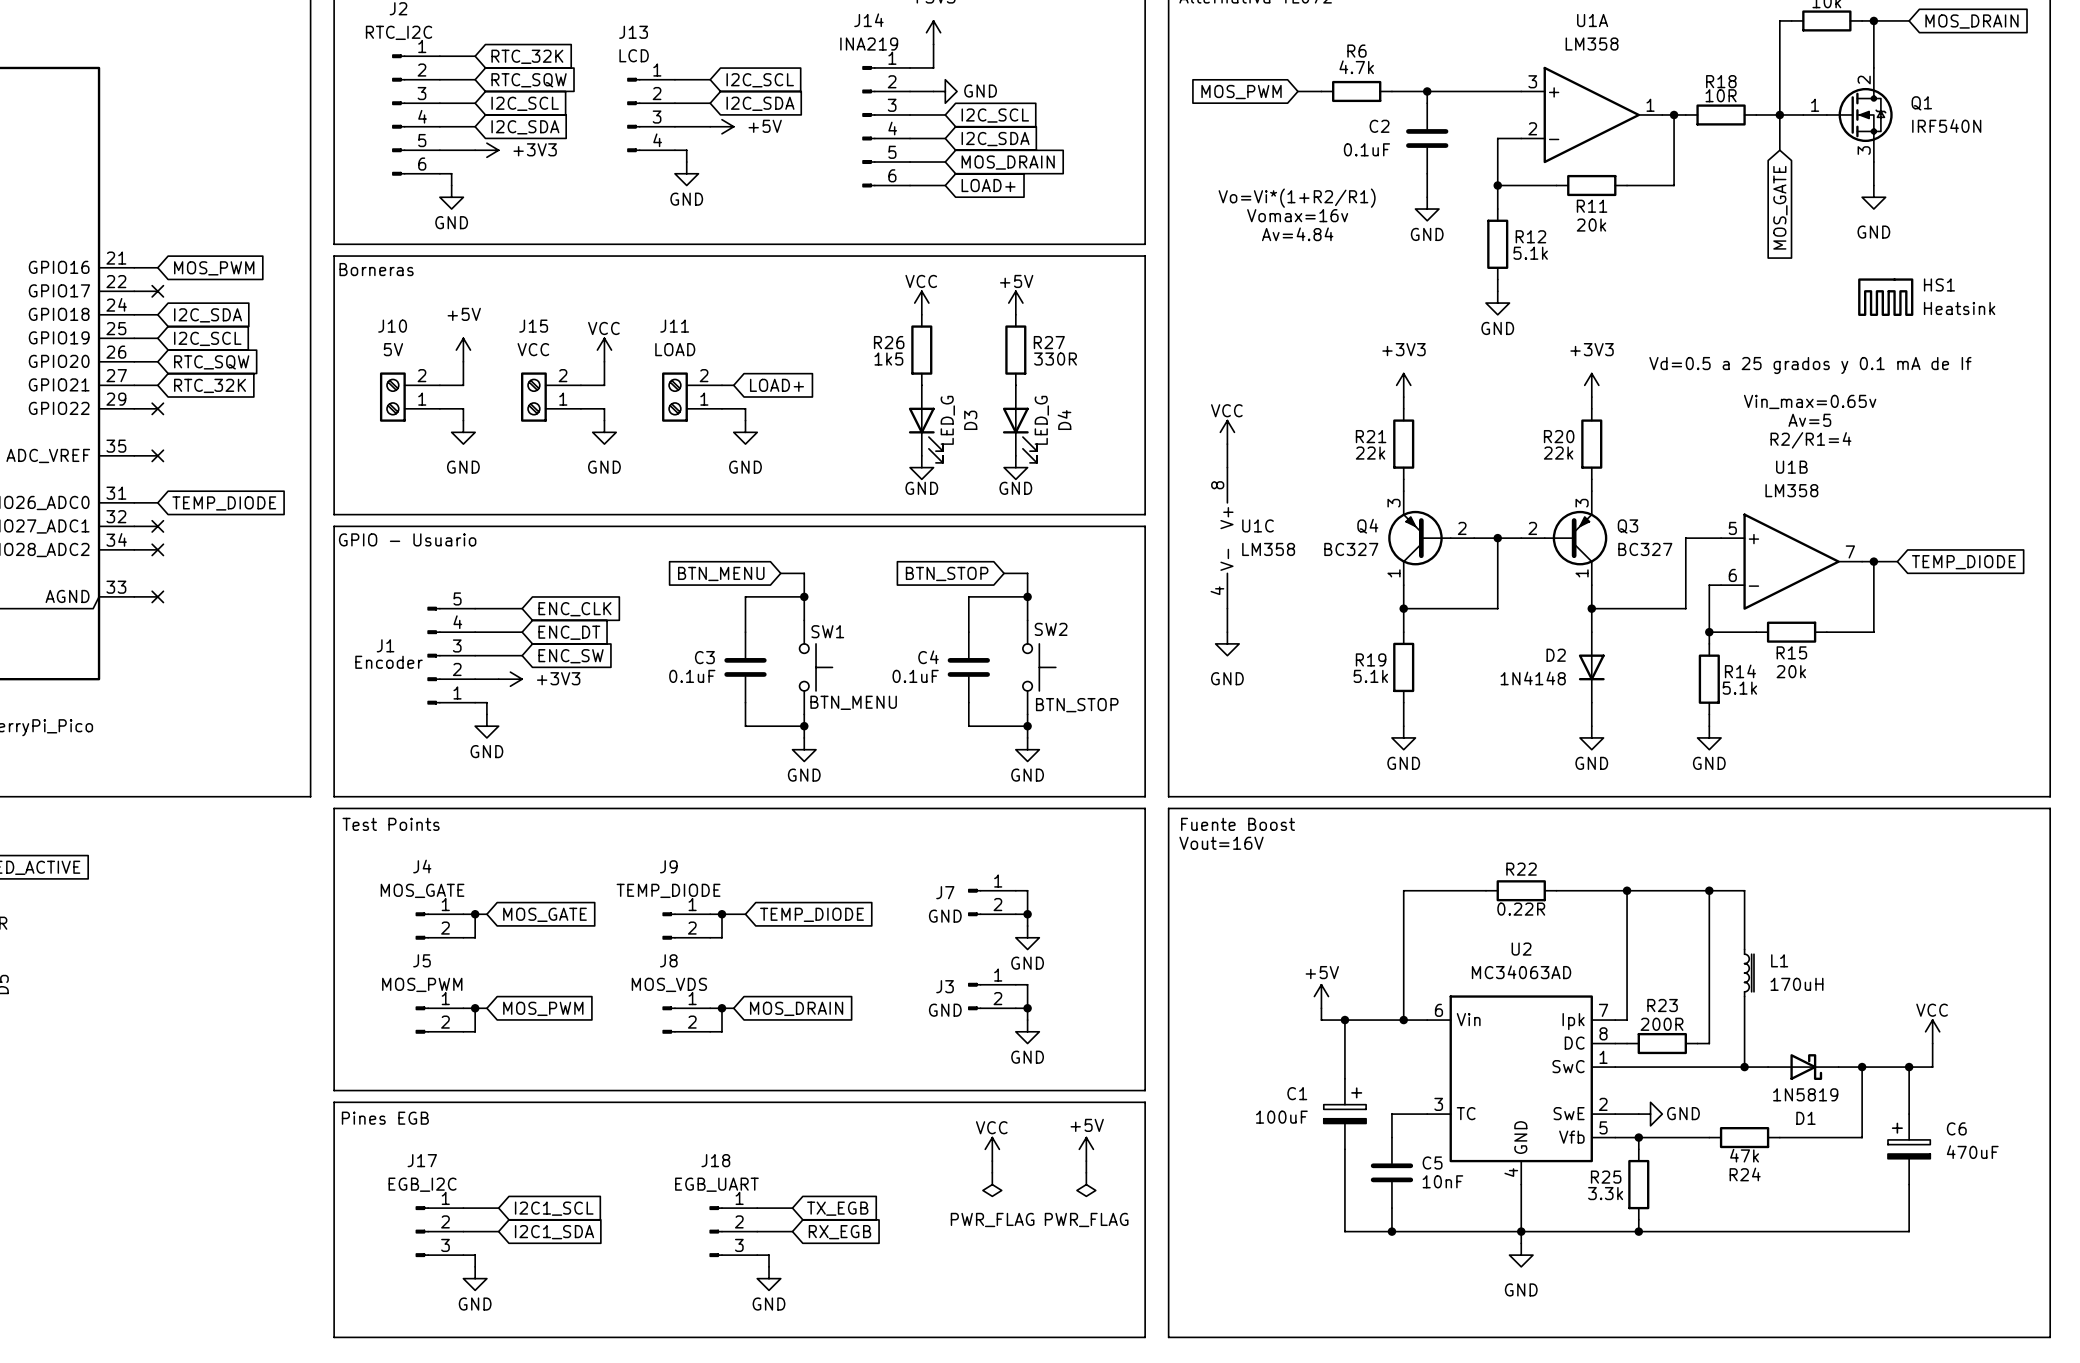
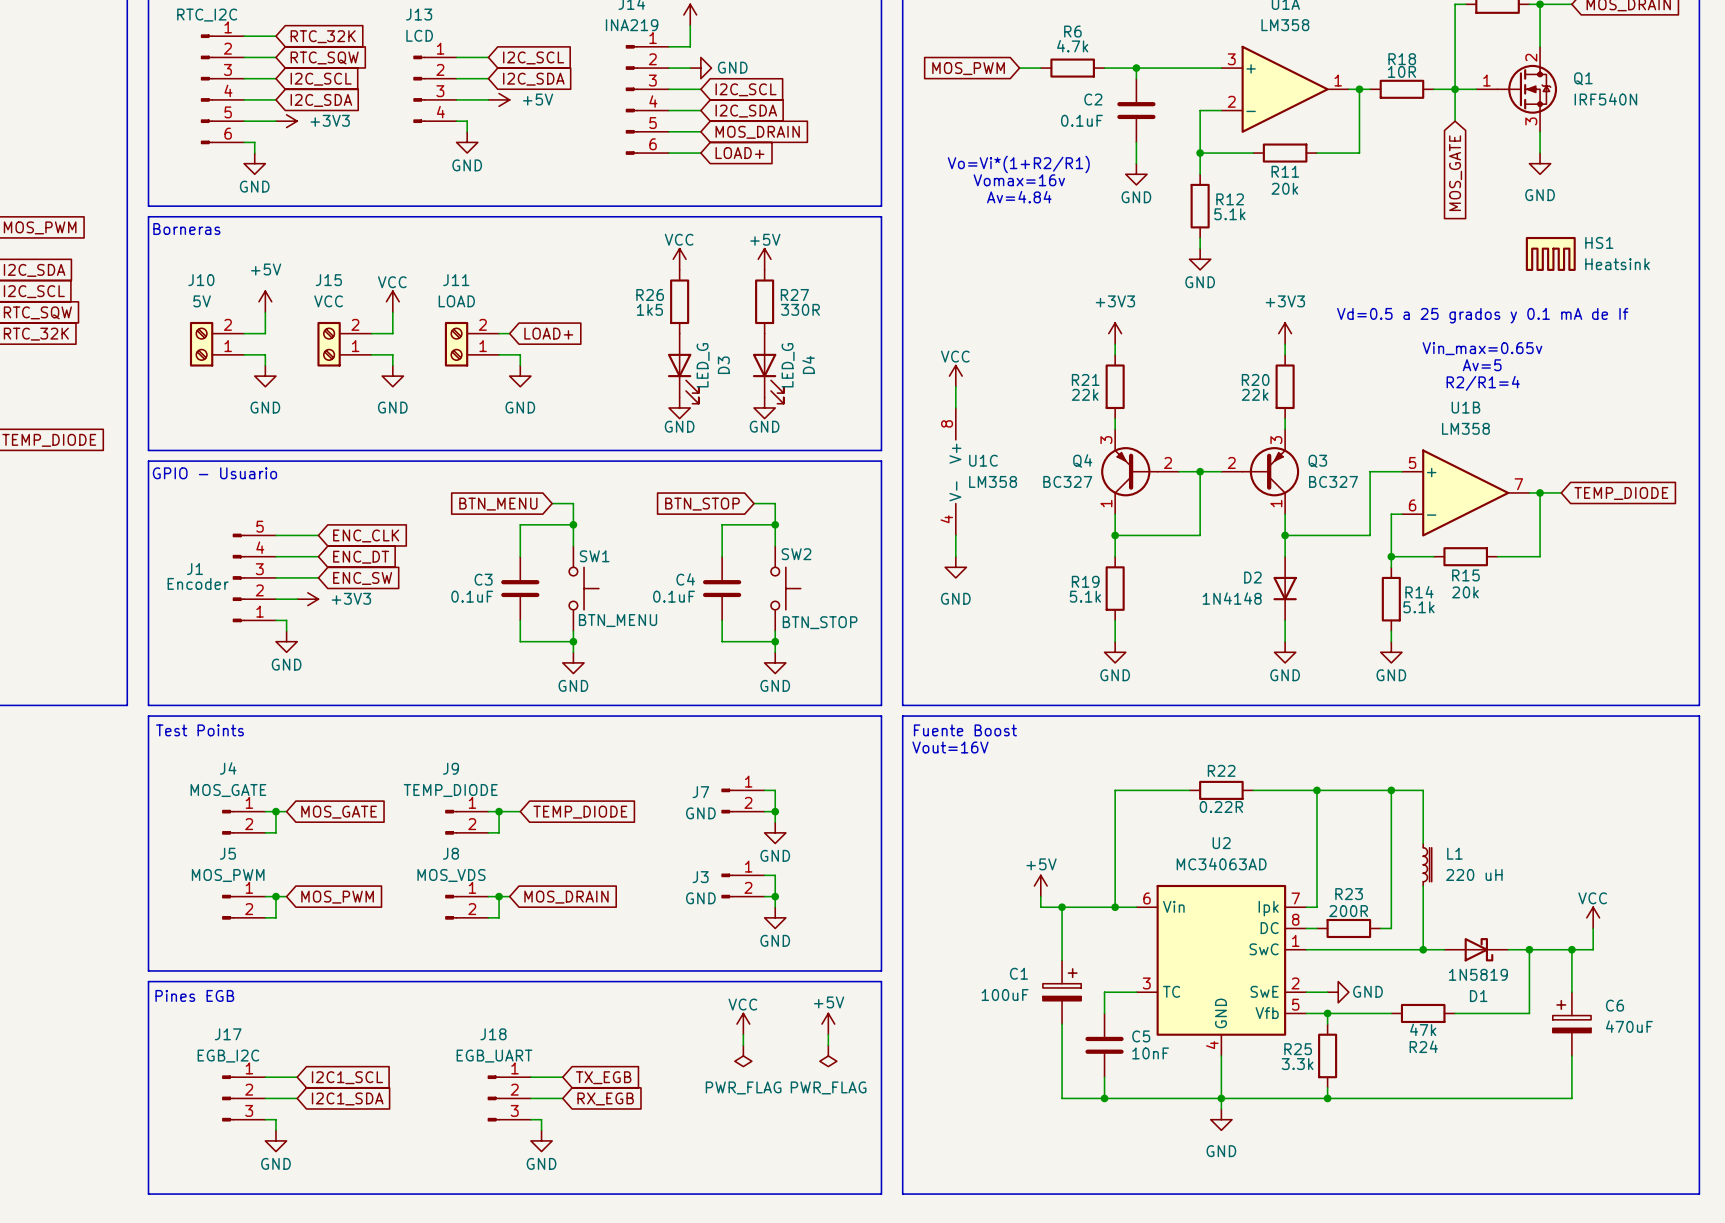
L1 value: 170uH (1797, 984) -> 220 uH (1474, 874)

